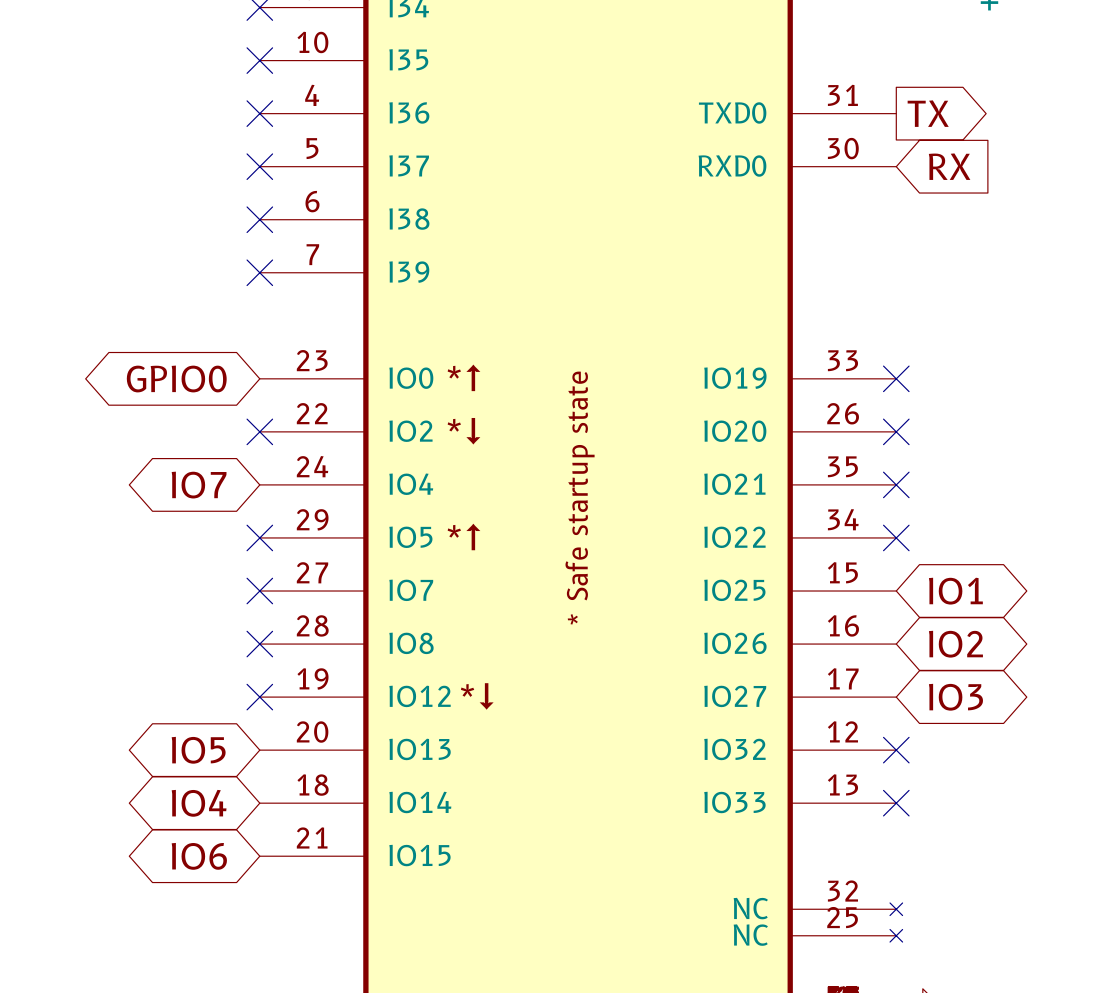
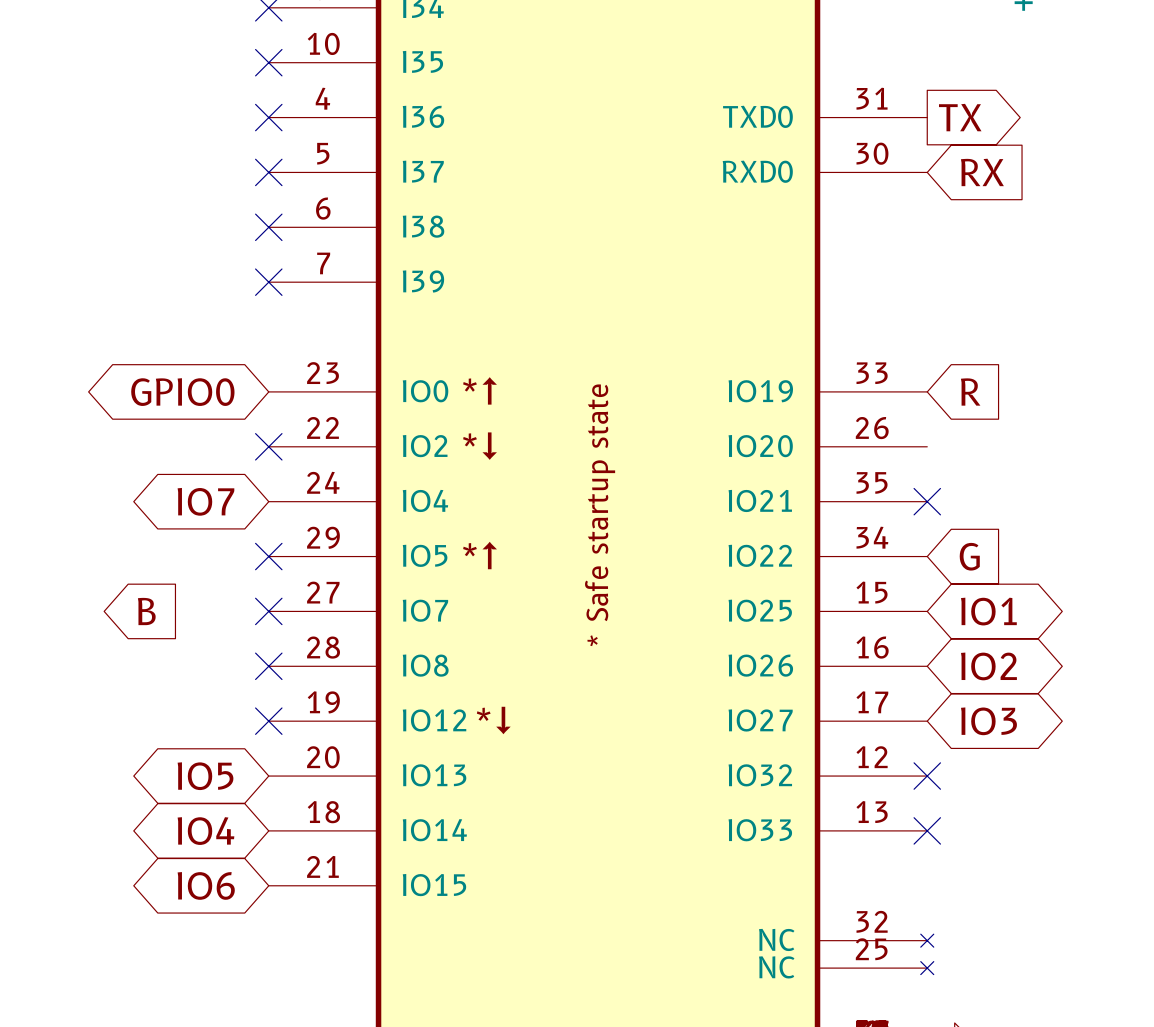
no-connect mark: (896, 378) -> none
global label: none -> R (970, 392)
no-connect mark: (896, 431) -> none
no-connect mark: (896, 537) -> none
global label: none -> G (969, 556)
global label: none -> B (146, 611)

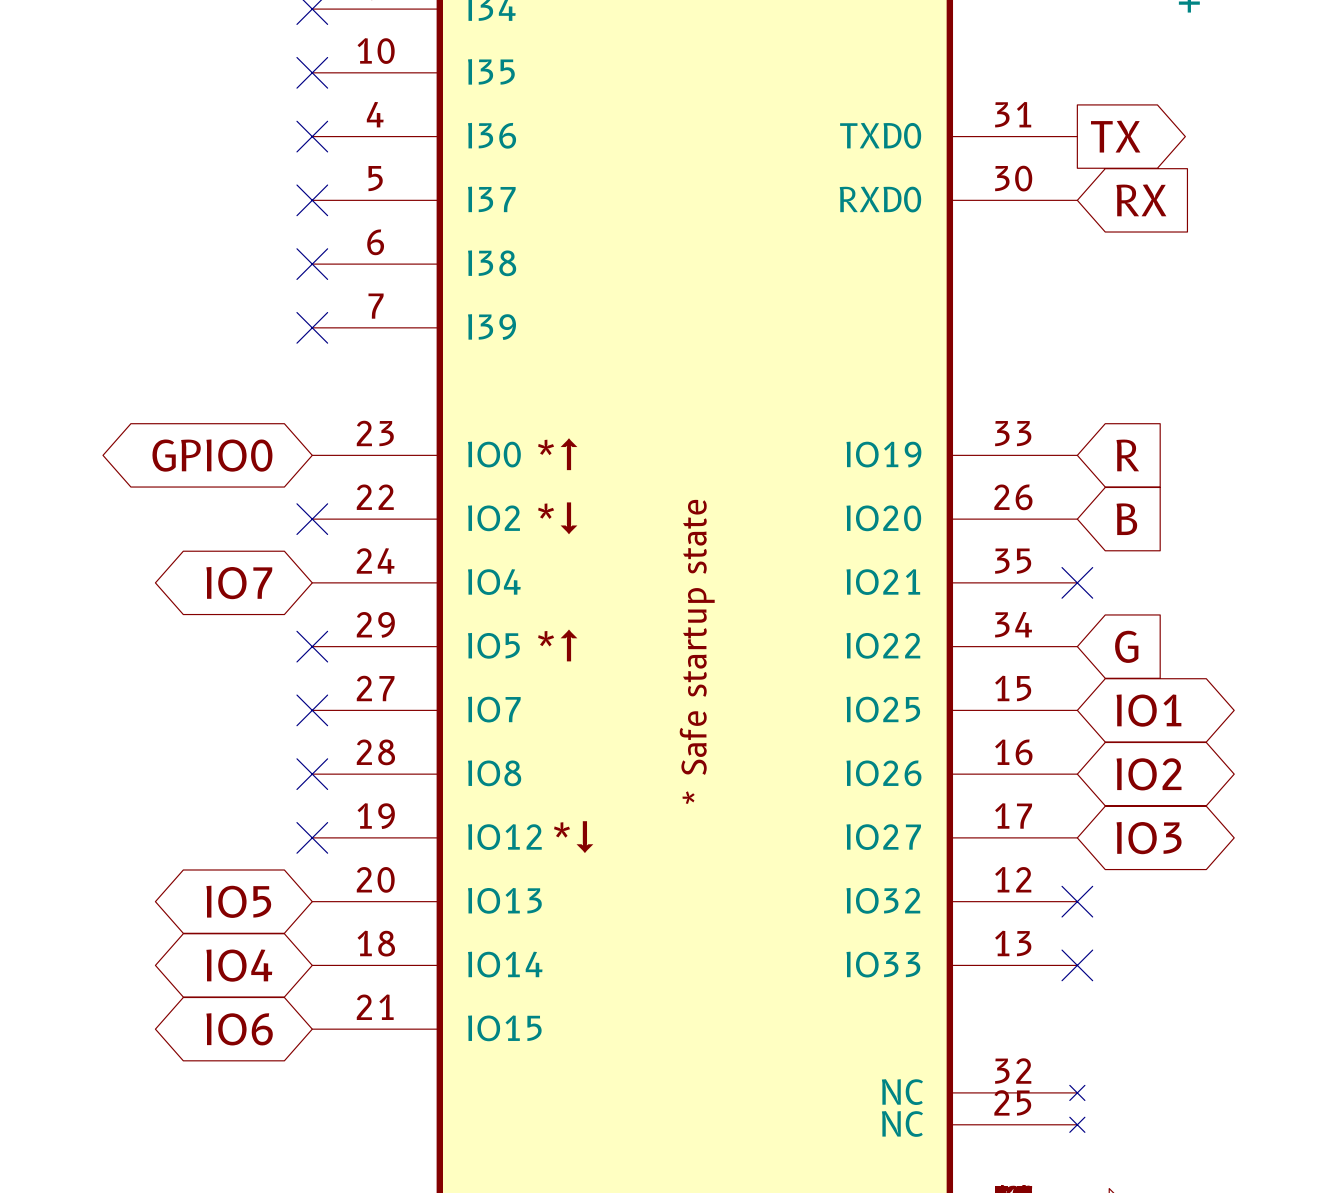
global label: none -> B (1126, 519)
part text position: * Safe startup state (600, 515) -> * Safe startup state (697, 651)
global label: B (146, 611) -> none

